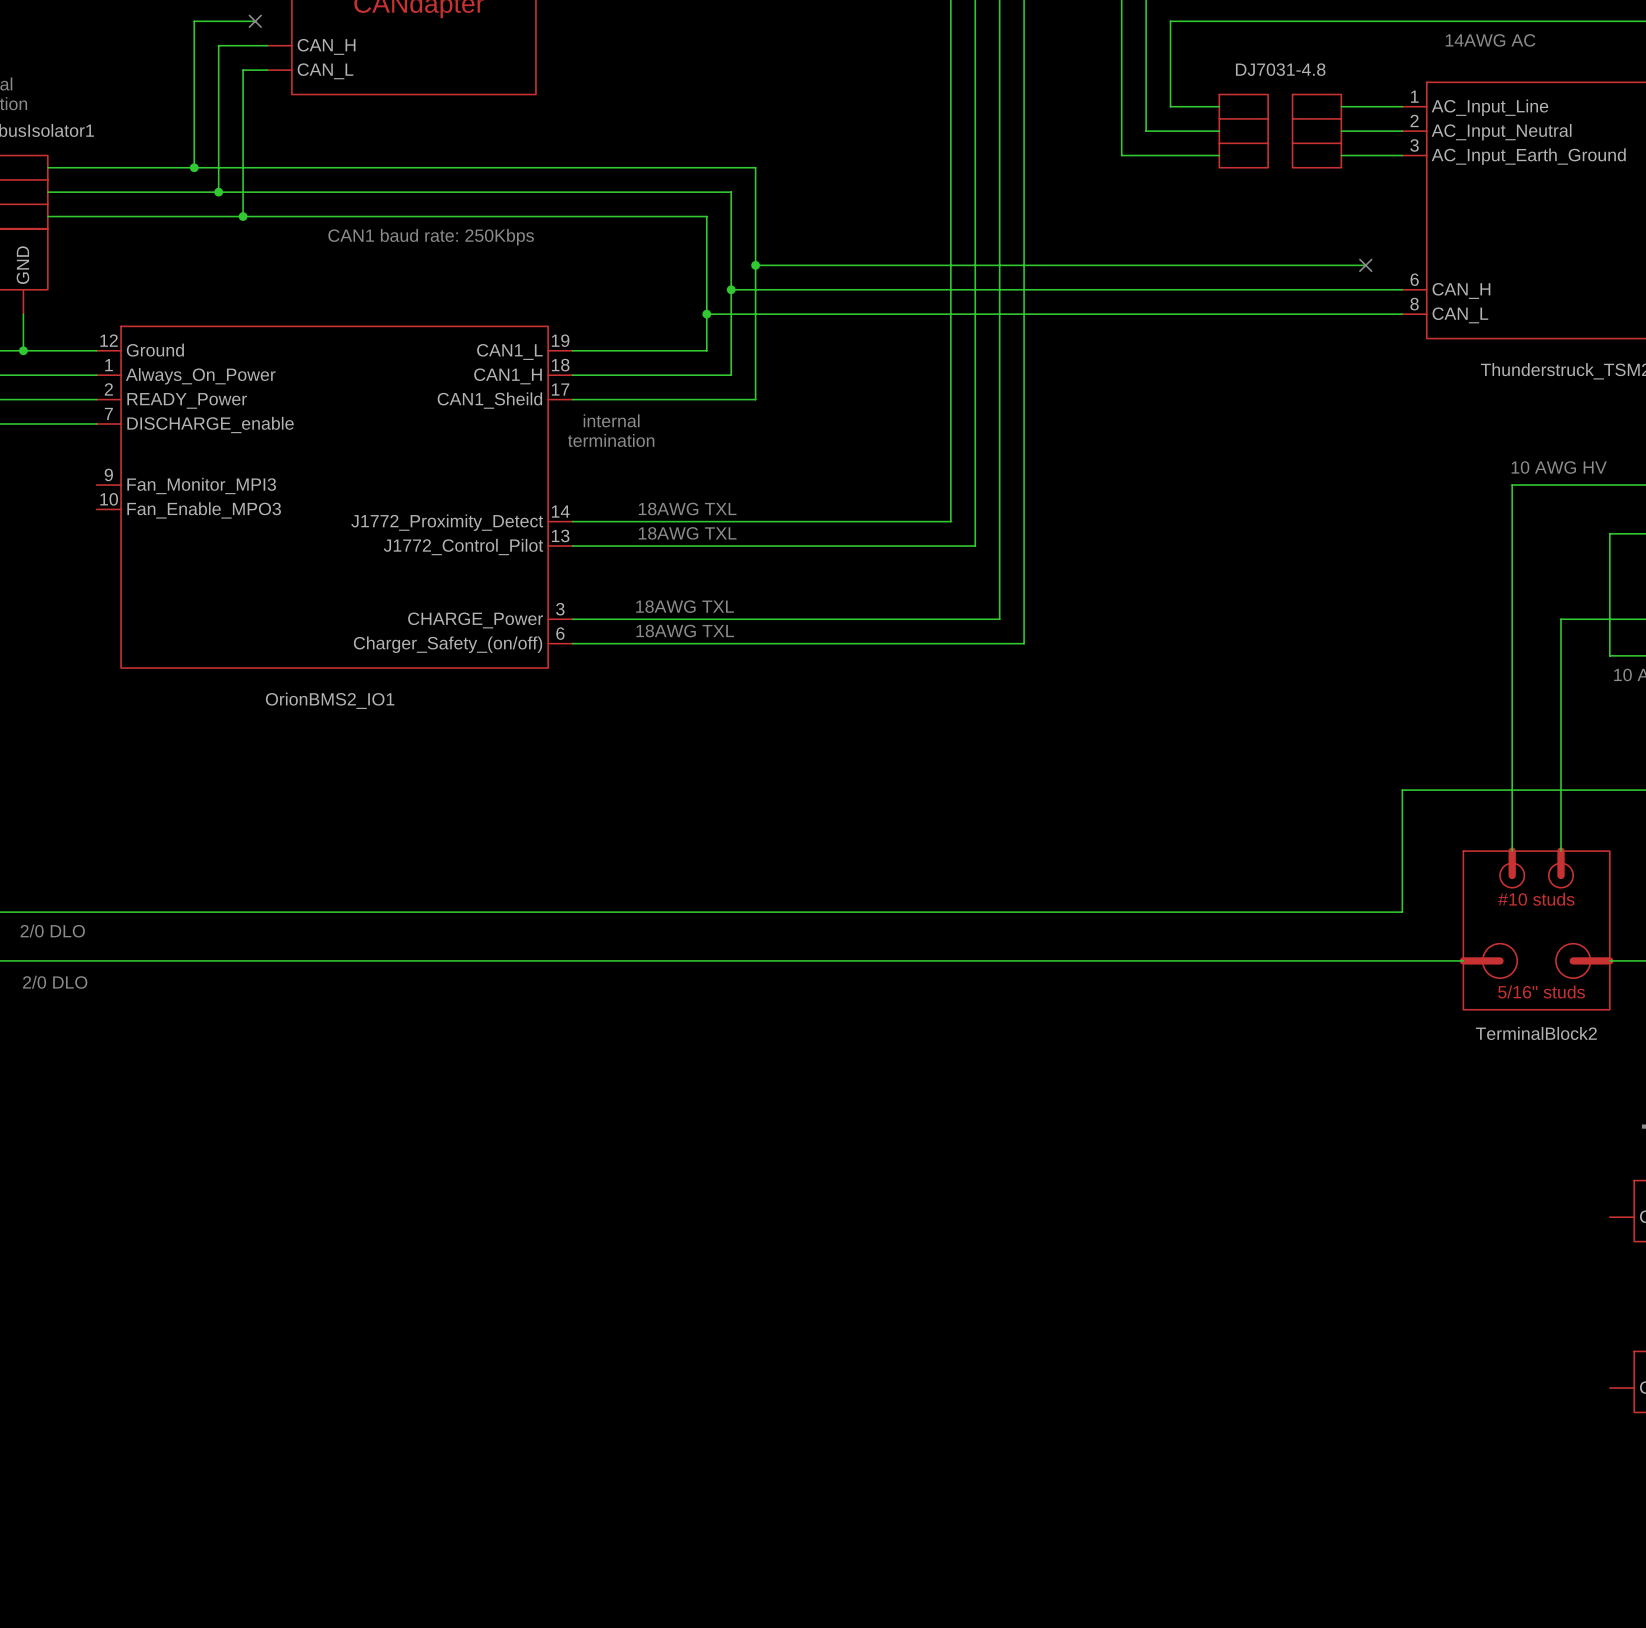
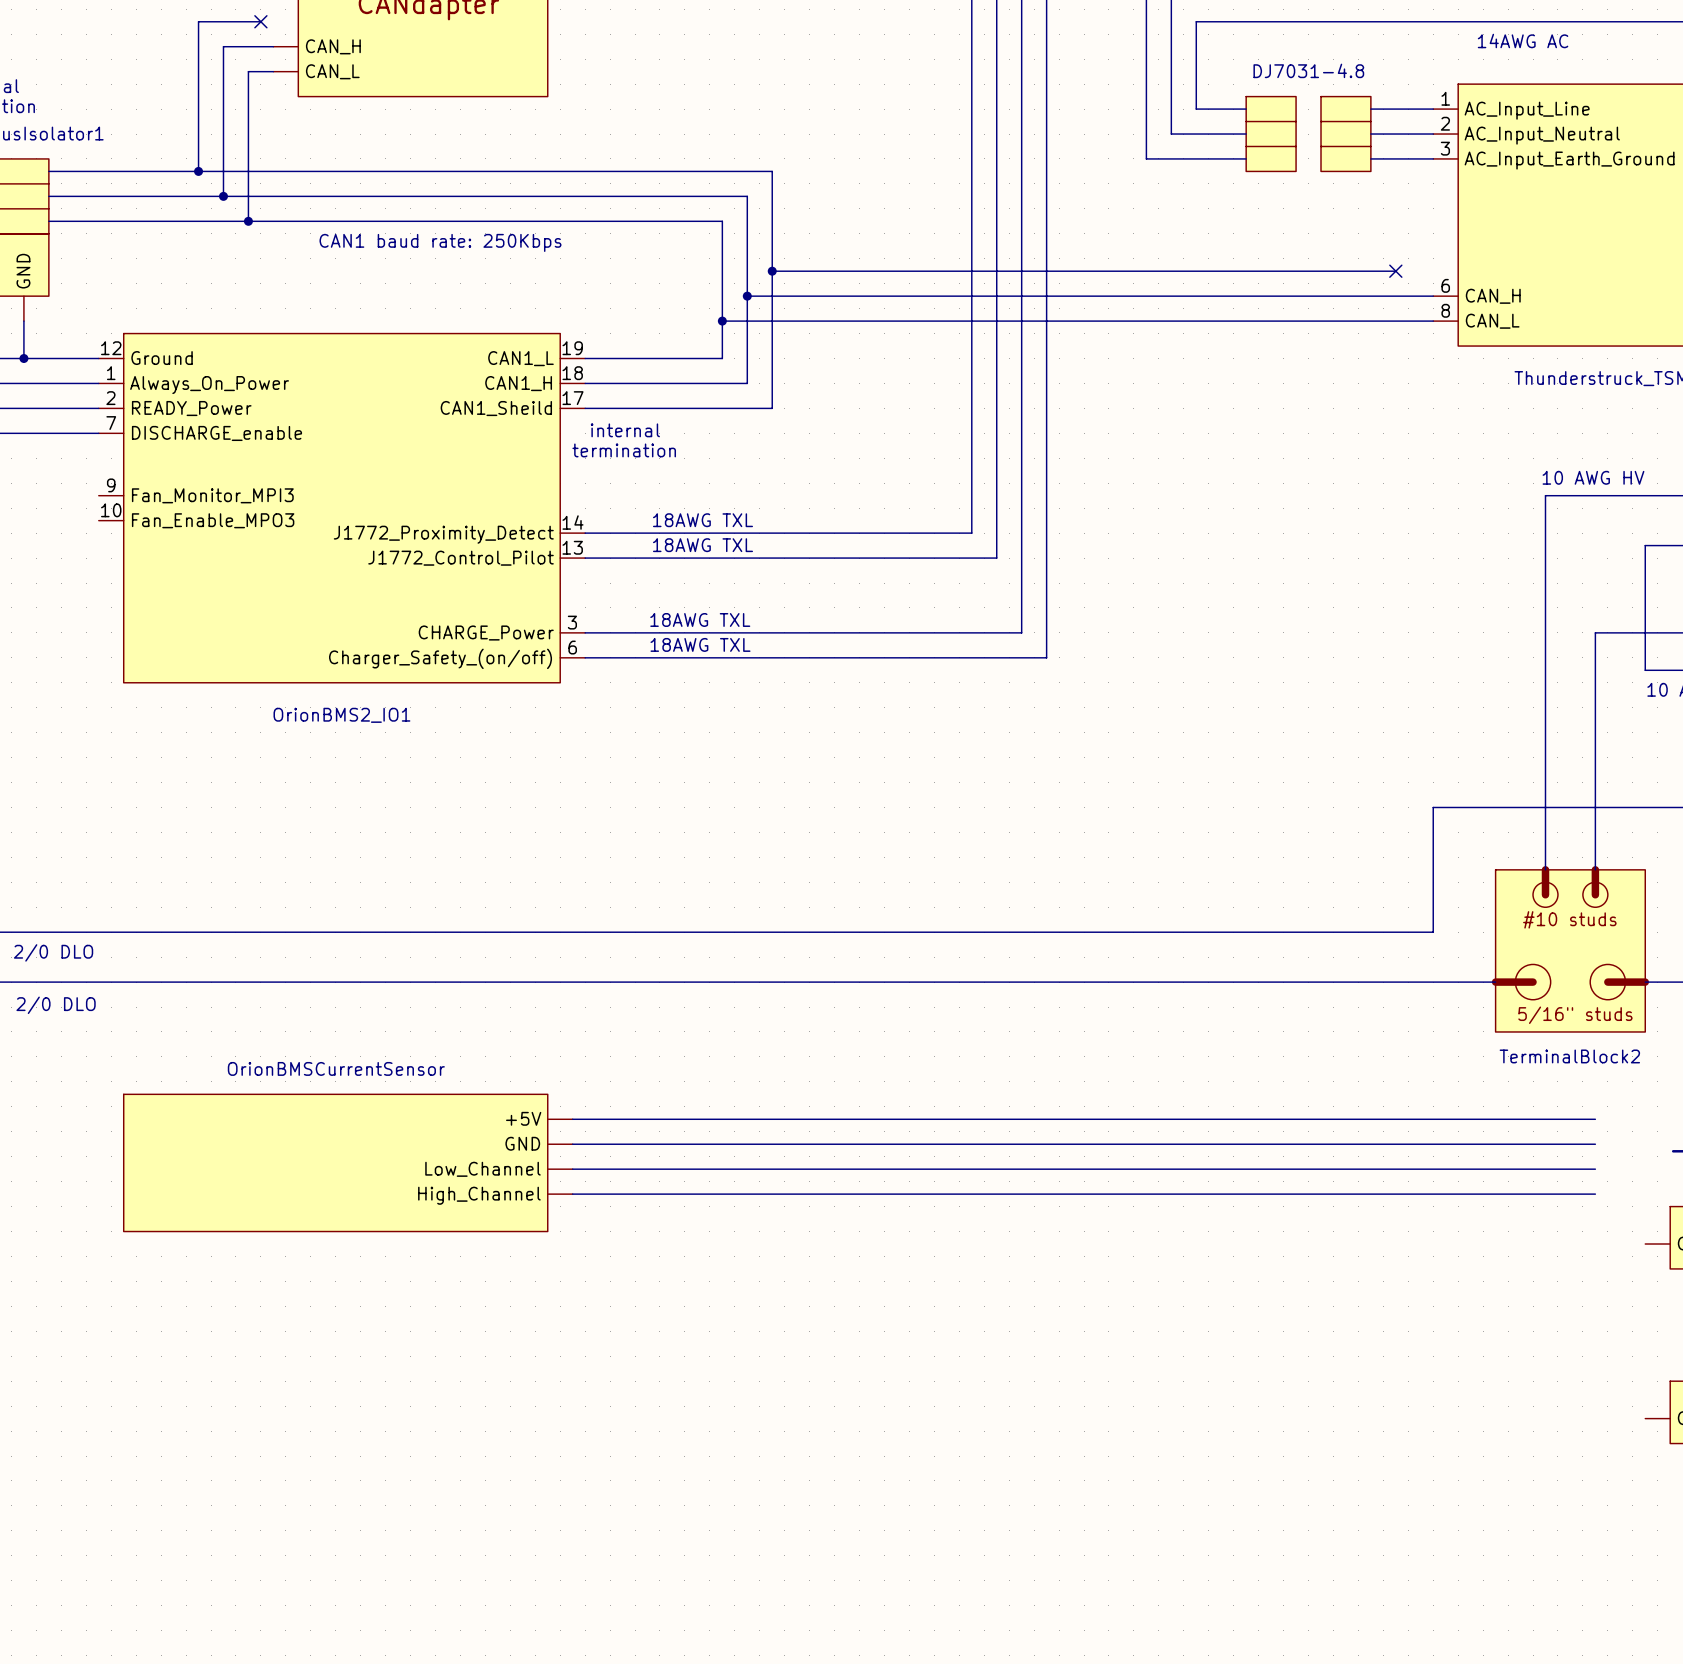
wire: none -> (572, 1119) (1595, 1119)
wire: none -> (572, 1144) (1595, 1144)
OrionBMSCurrentSensor: none -> (348, 1162)
wire: none -> (572, 1169) (1595, 1169)
wire: none -> (572, 1194) (1595, 1194)

